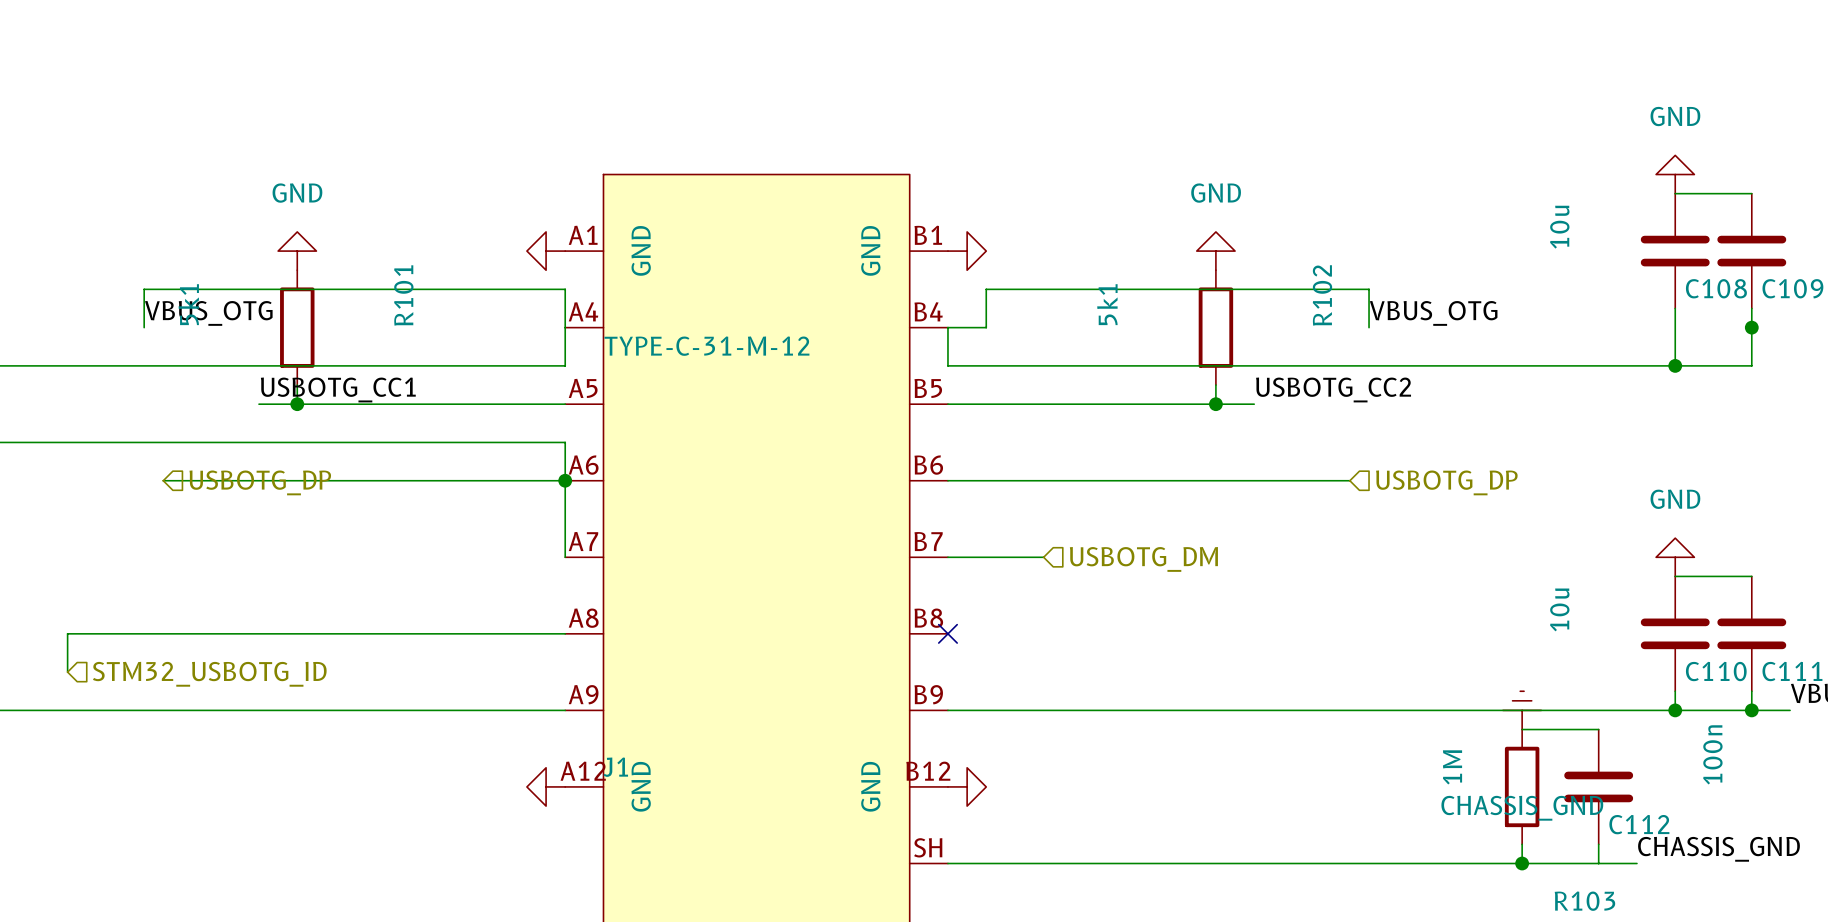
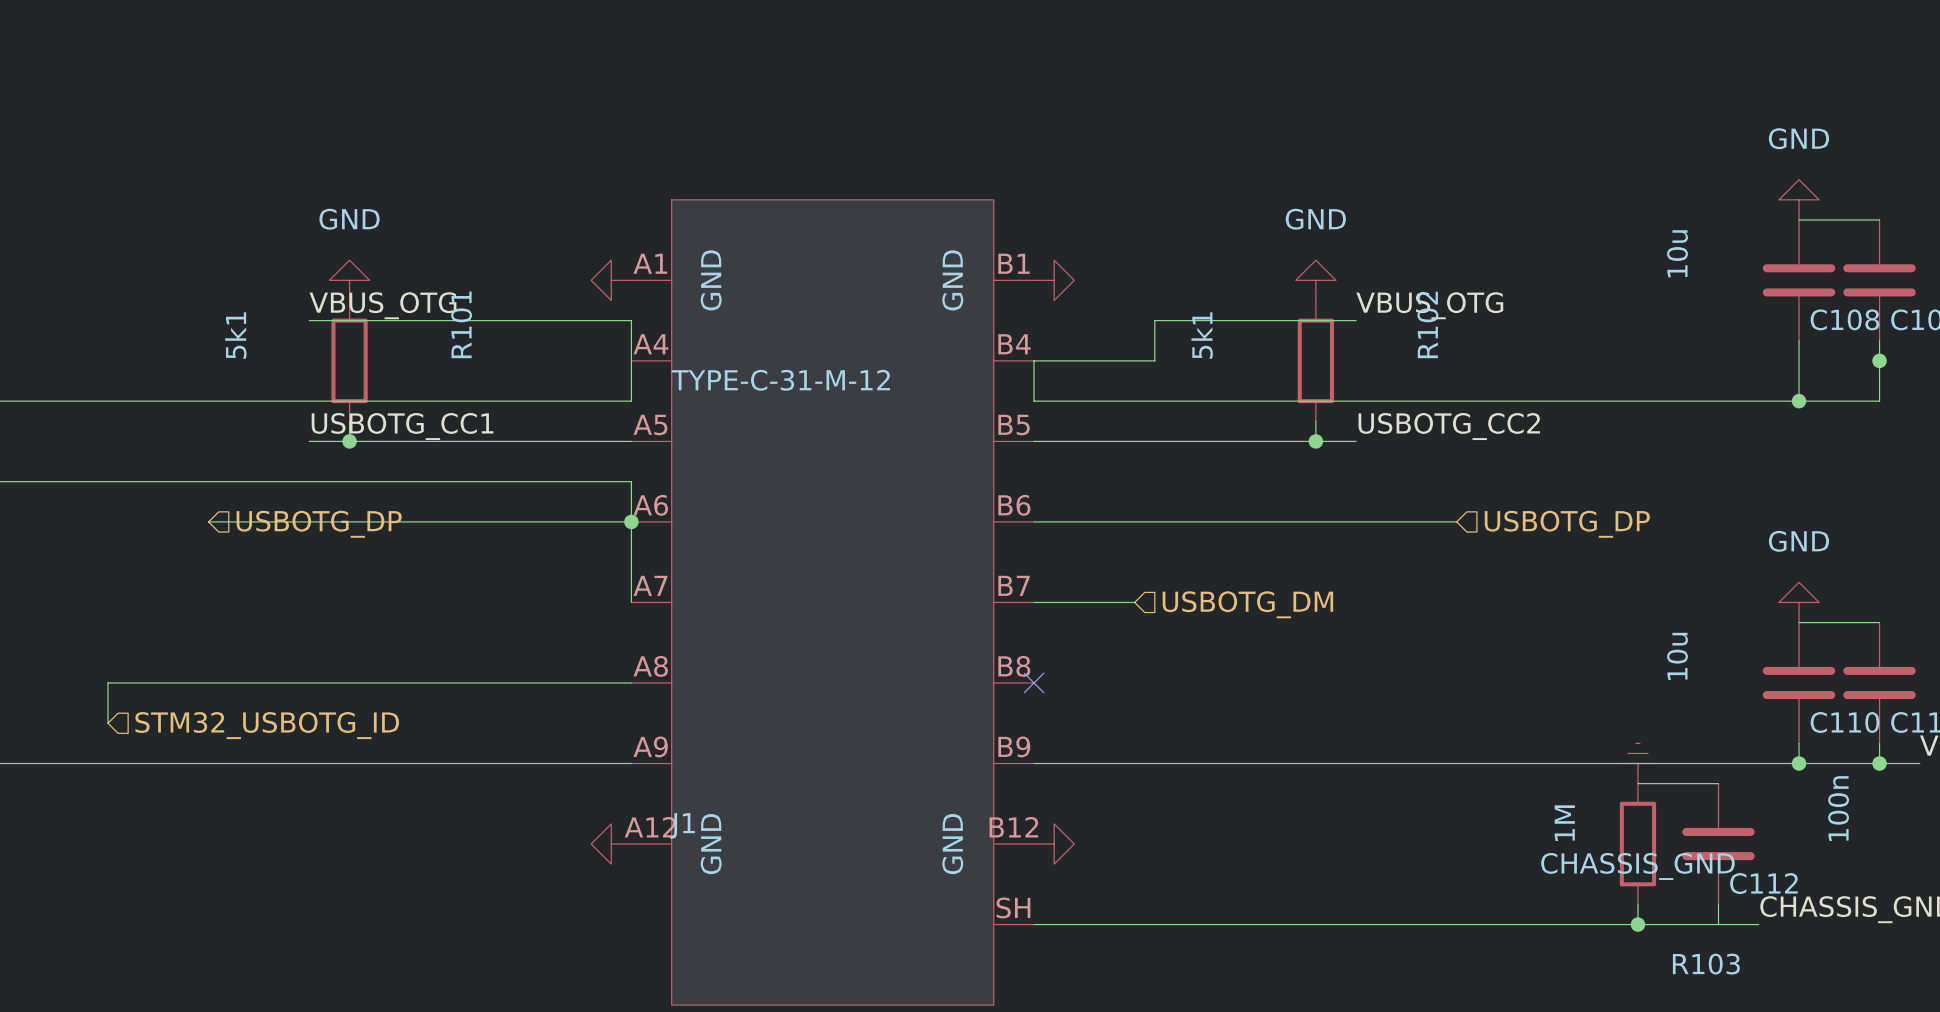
wire: (258, 289) (144, 289) (144, 327) -> none
wire: (1062, 289) (986, 289) (986, 327) -> (1154, 320) (1154, 360) (1074, 360)
wire: (1254, 289) (1369, 289) (1369, 327) -> none
label position: VBUS_OTG (208, 313) -> VBUS_OTG (382, 305)
label position: VBUS_OTG (1433, 313) -> VBUS_OTG (1429, 305)

